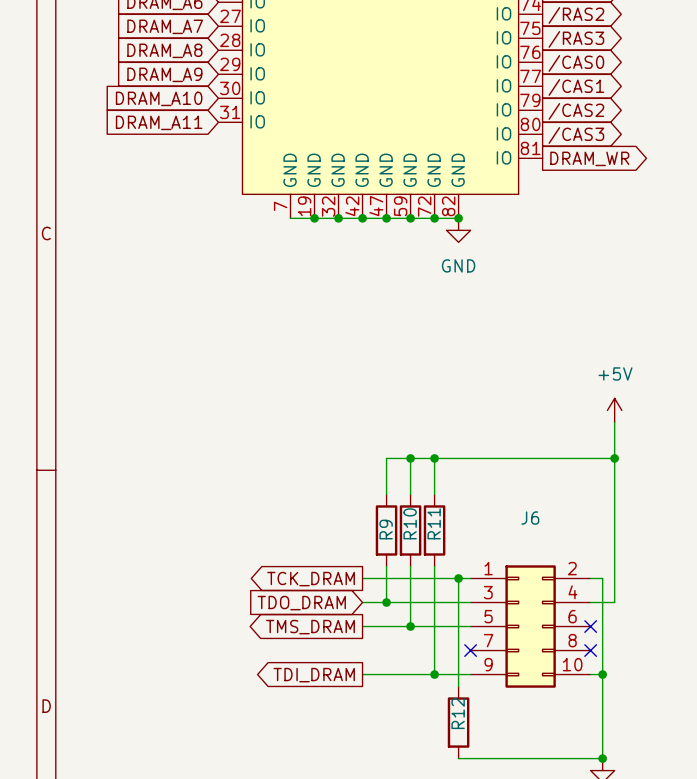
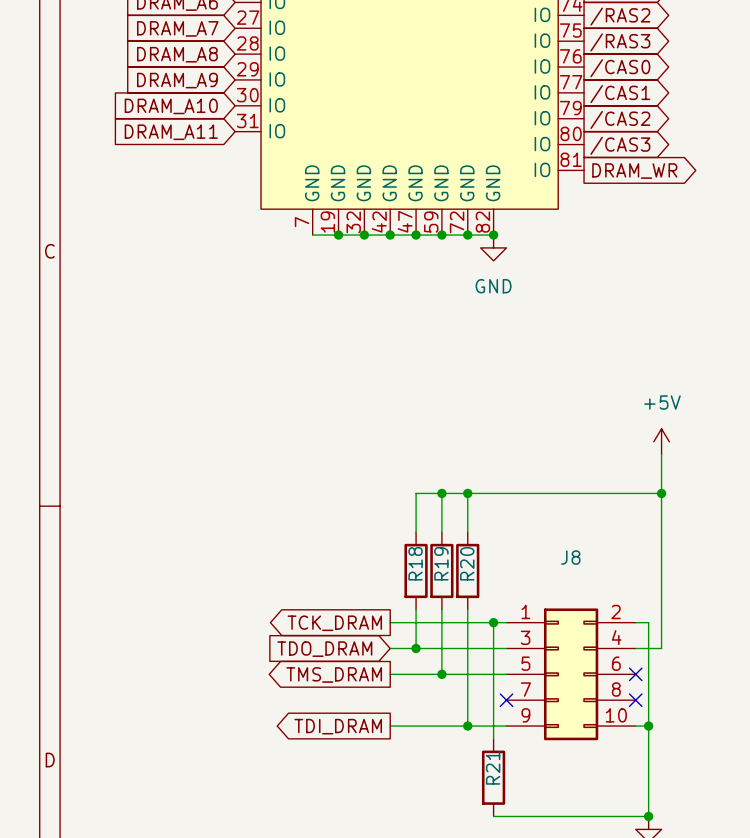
J6 name: J6 (530, 518) -> J8 (570, 557)
R10 name: R10 (410, 523) -> R19 (441, 563)
R11 name: R11 (434, 523) -> R20 (467, 563)
R9 name: R9 (386, 529) -> R18 (415, 563)
R12 name: R12 (458, 713) -> R21 (493, 767)

